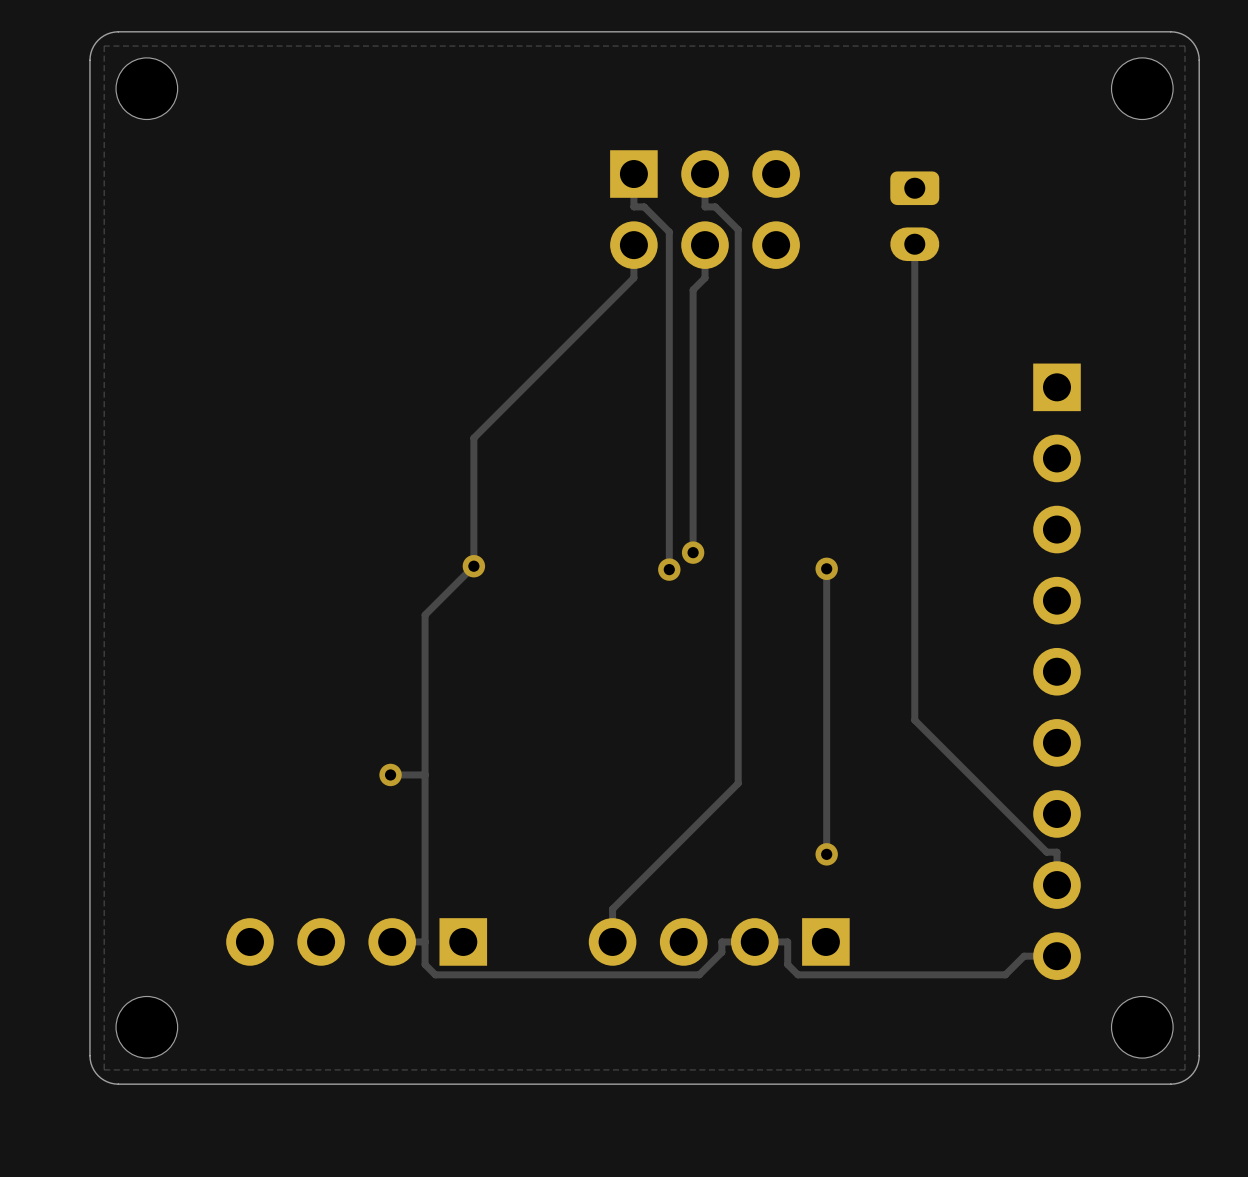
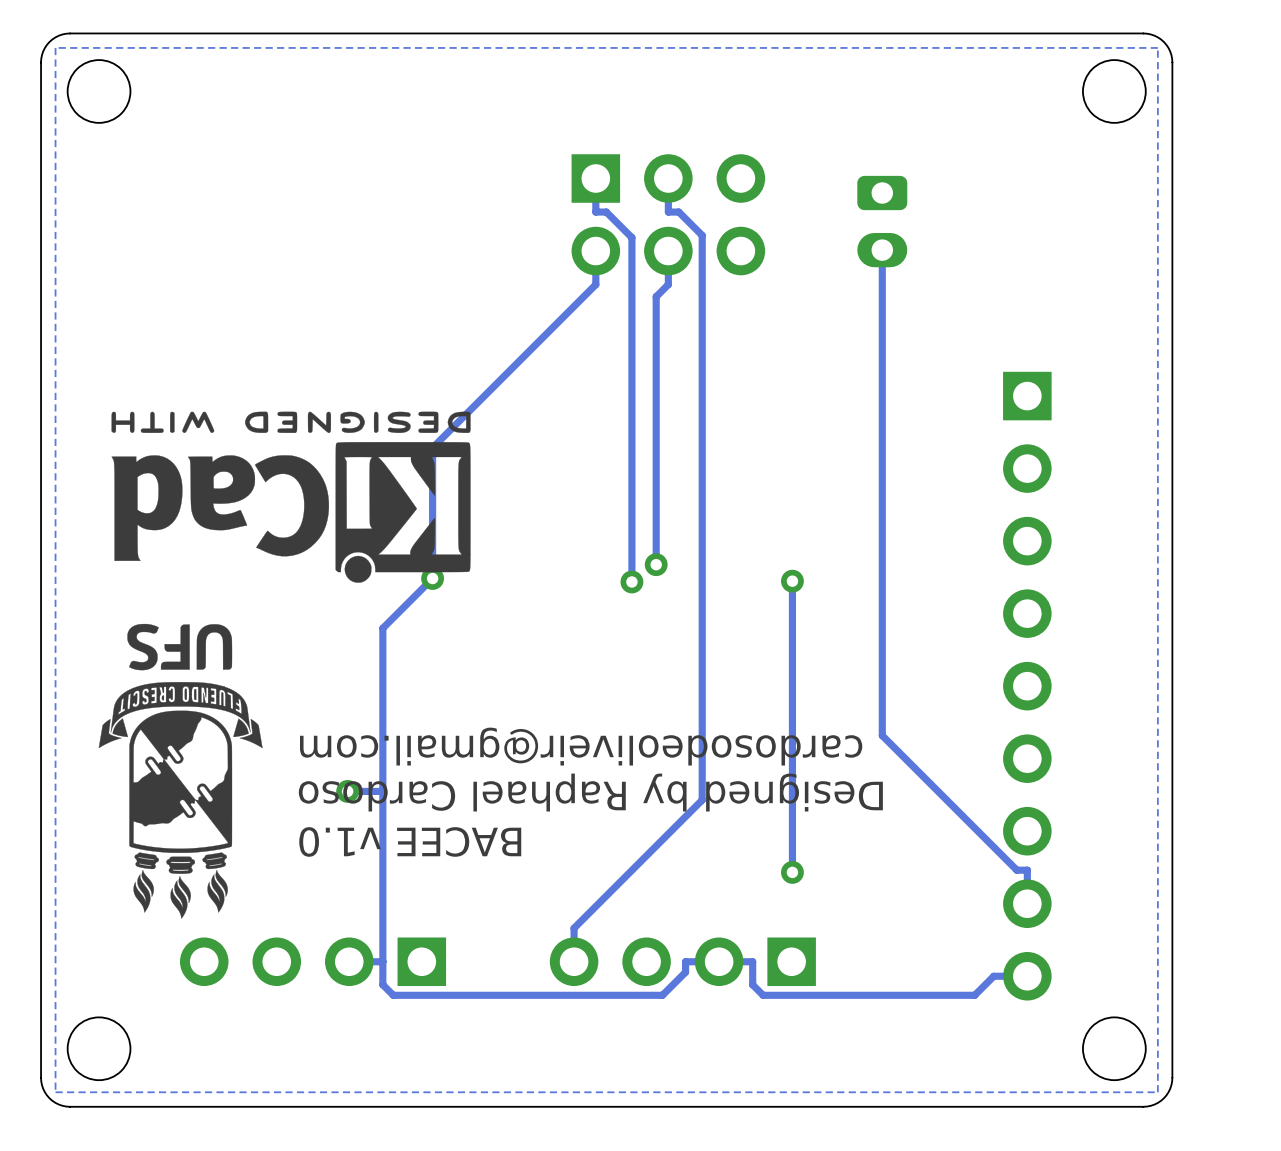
drawing: none -> [111, 411, 471, 583]
drawing: none -> [98, 623, 263, 919]
text: none -> cardosodeoliveir@gmail.com (581, 746)
text: none -> Designed by Raphael Cardoso (590, 792)
text: none -> BACEE v1.0 (410, 841)

